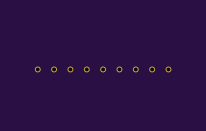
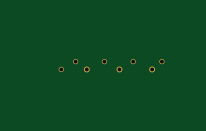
via: none -> (75, 61)
via: none -> (104, 61)
via: none -> (133, 61)
via: none -> (161, 61)
via: (37, 69) -> none
via: (54, 69) -> none
via: none -> (61, 69)
via: (70, 69) -> none
via: (103, 69) -> none
via: (135, 69) -> none
via: (168, 69) -> none

